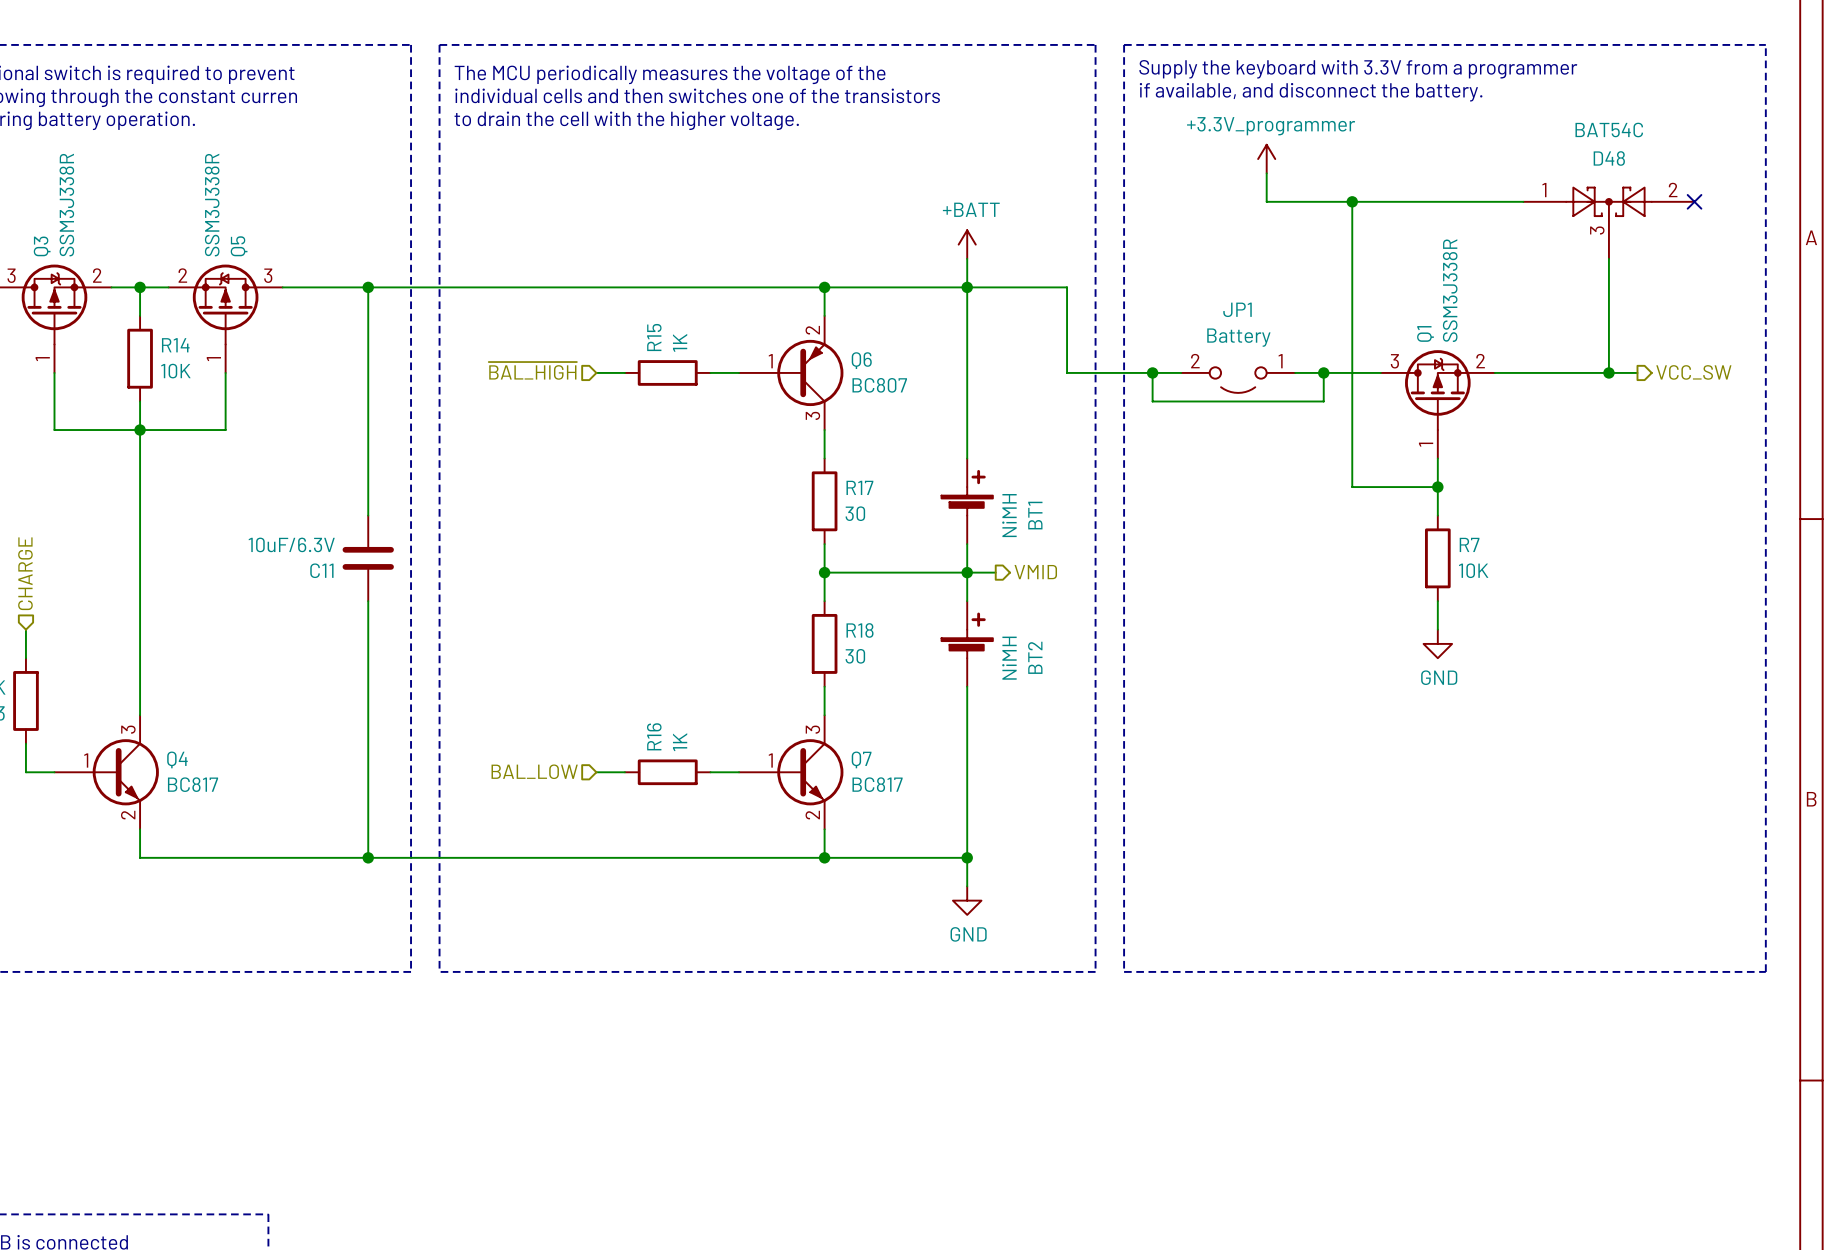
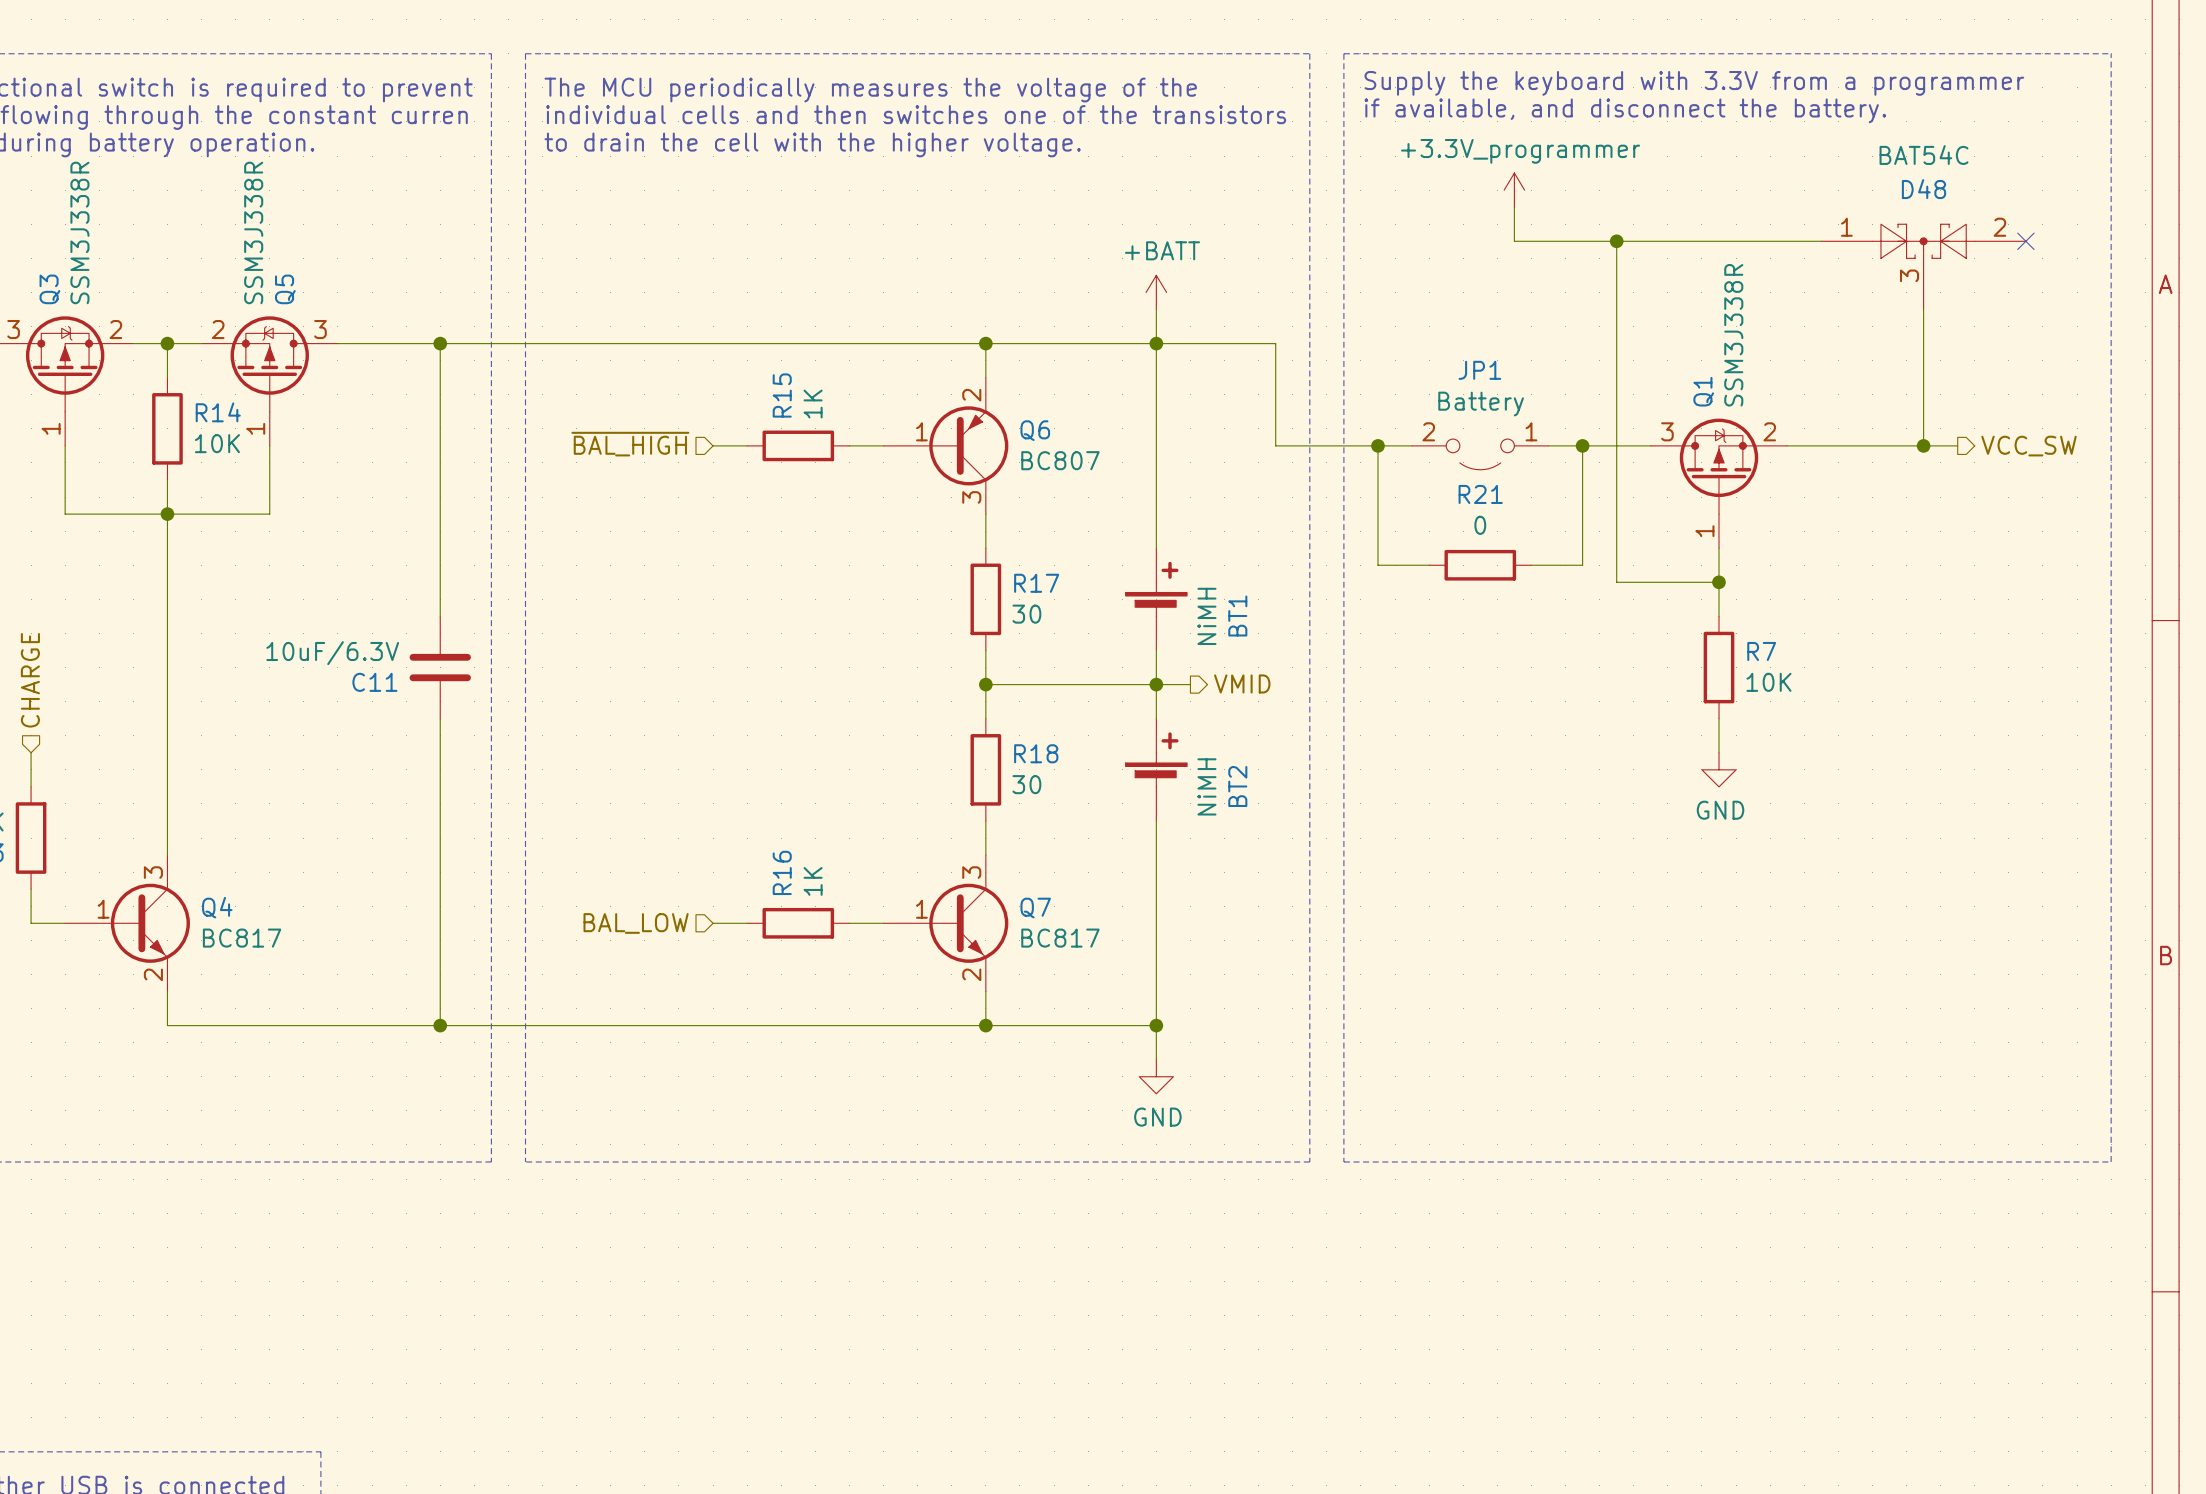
wire: (1152, 401) (1323, 401) -> (1531, 565) (1582, 565) (1582, 480)
wire: none -> (1378, 480) (1378, 565) (1429, 565)
R21: none -> 0 (1480, 565)

